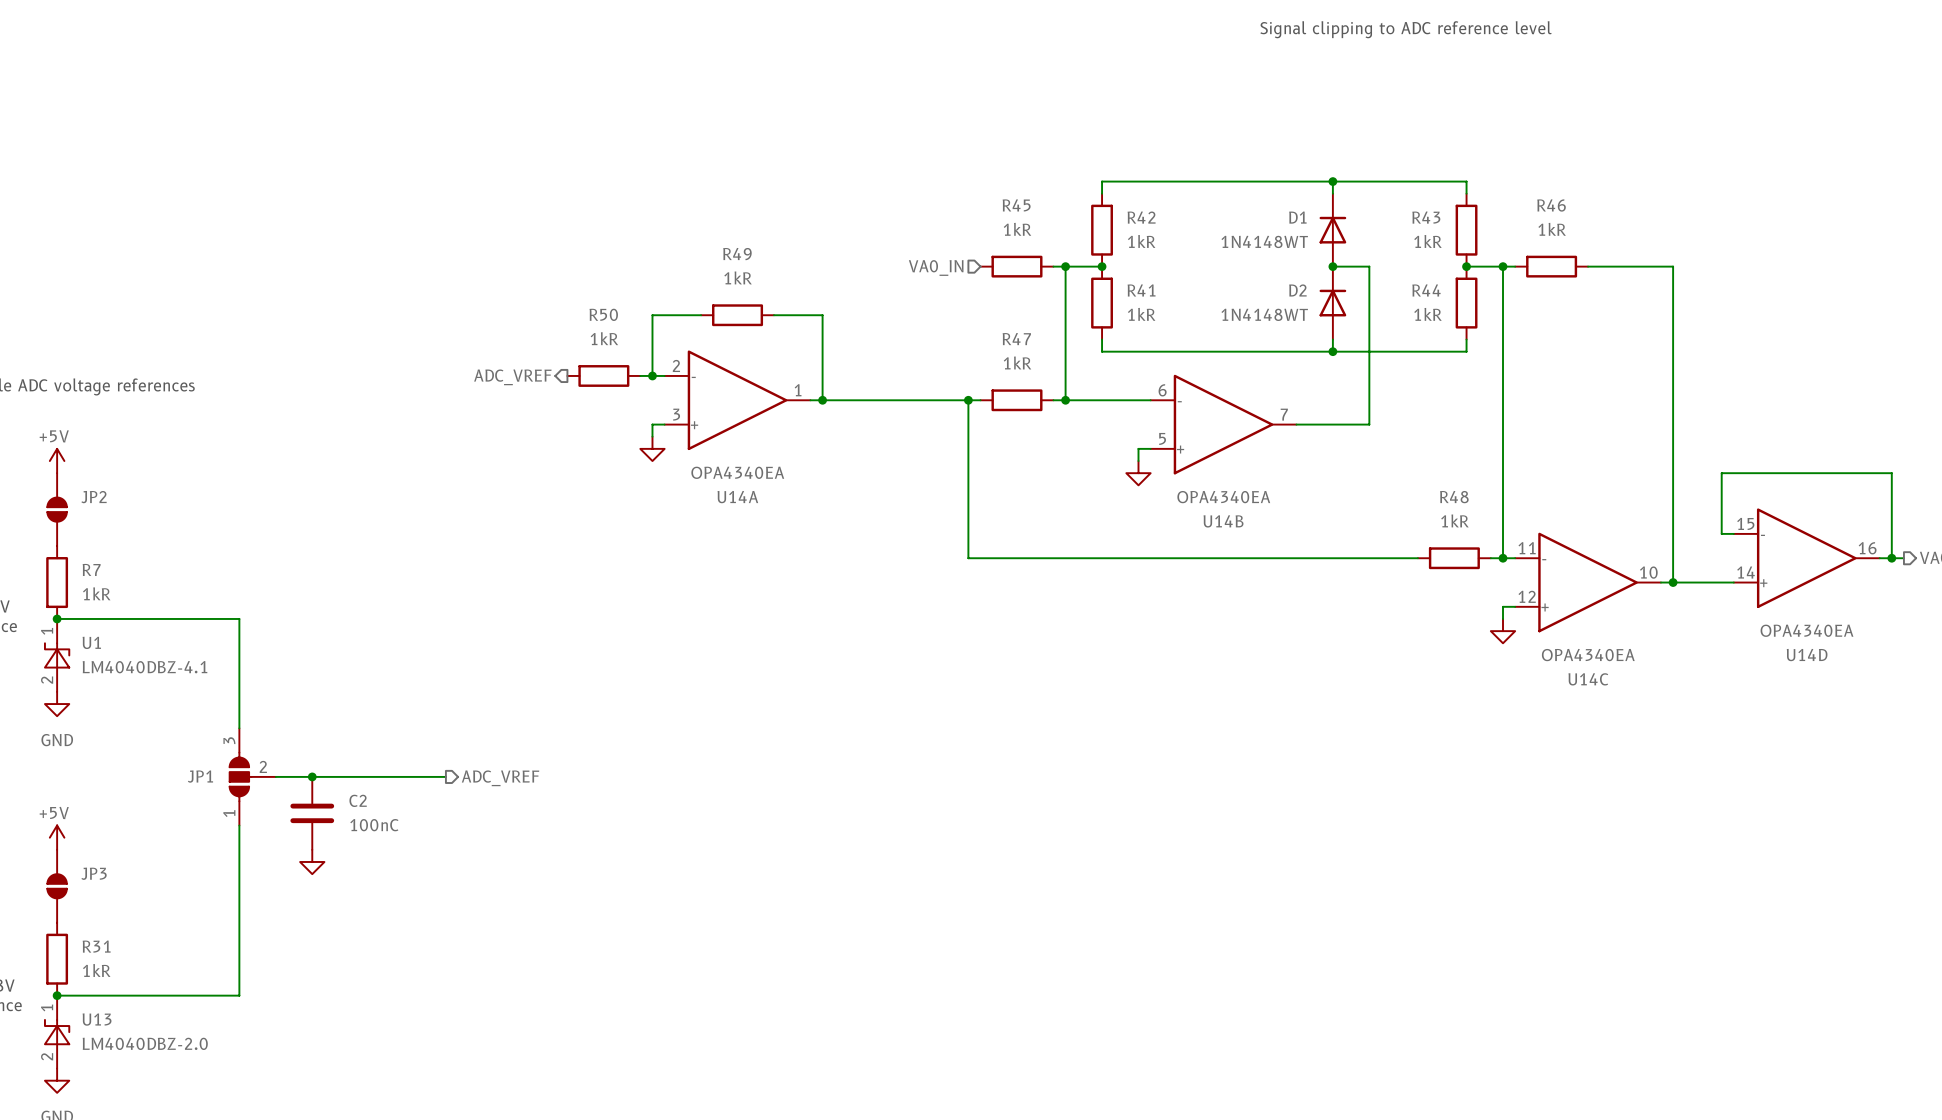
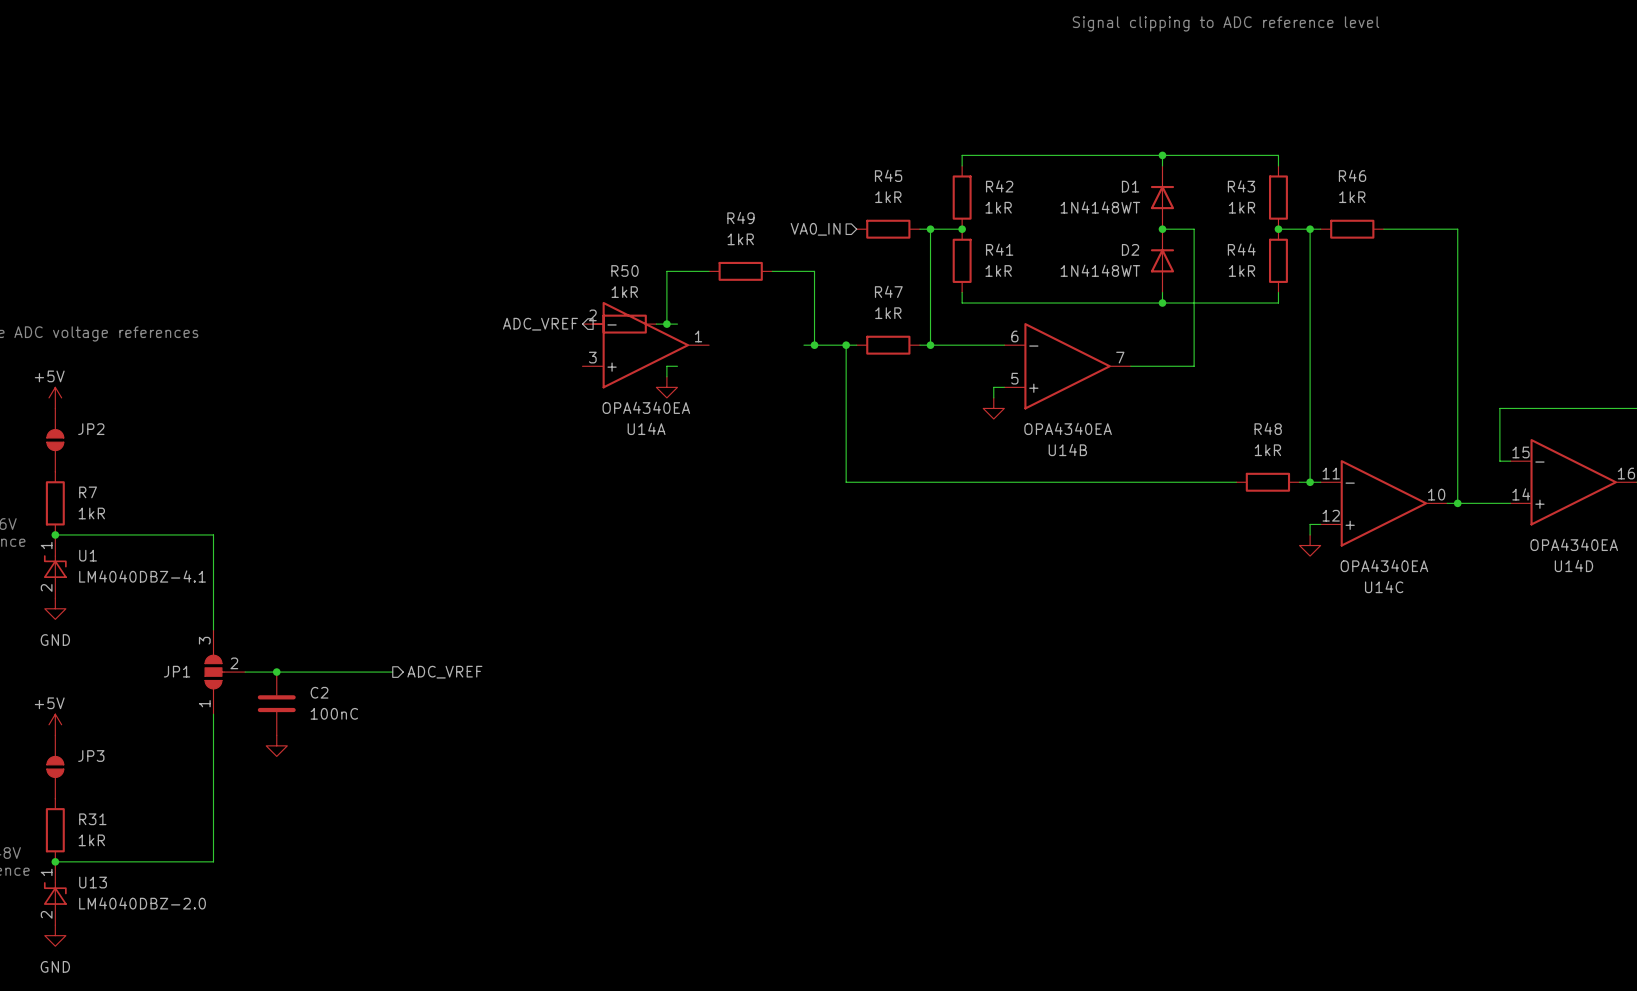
wire: (701, 315) (652, 315) (652, 375) -> none
R49 position: (737, 315) -> (740, 271)
wire: none -> (677, 271) (666, 271) (666, 324)
wire: (810, 315) (822, 315) (822, 400) -> none
wire: none -> (772, 271) (814, 271) (814, 345)
R50 position: (603, 375) -> (624, 324)
wire: (640, 375) (664, 375) -> (656, 324) (677, 324)
junction: (652, 375) -> none
junction: none -> (666, 324)
hierarchical label position: ADC_VREF (512, 377) -> ADC_VREF (540, 324)
wire: (810, 400) (919, 400) -> none
junction: (822, 400) -> none
junction: none -> (814, 345)
wire: (664, 424) (652, 424) (652, 436) -> (677, 366) (666, 366) (666, 376)
power symbol position: (652, 448) -> (666, 387)

